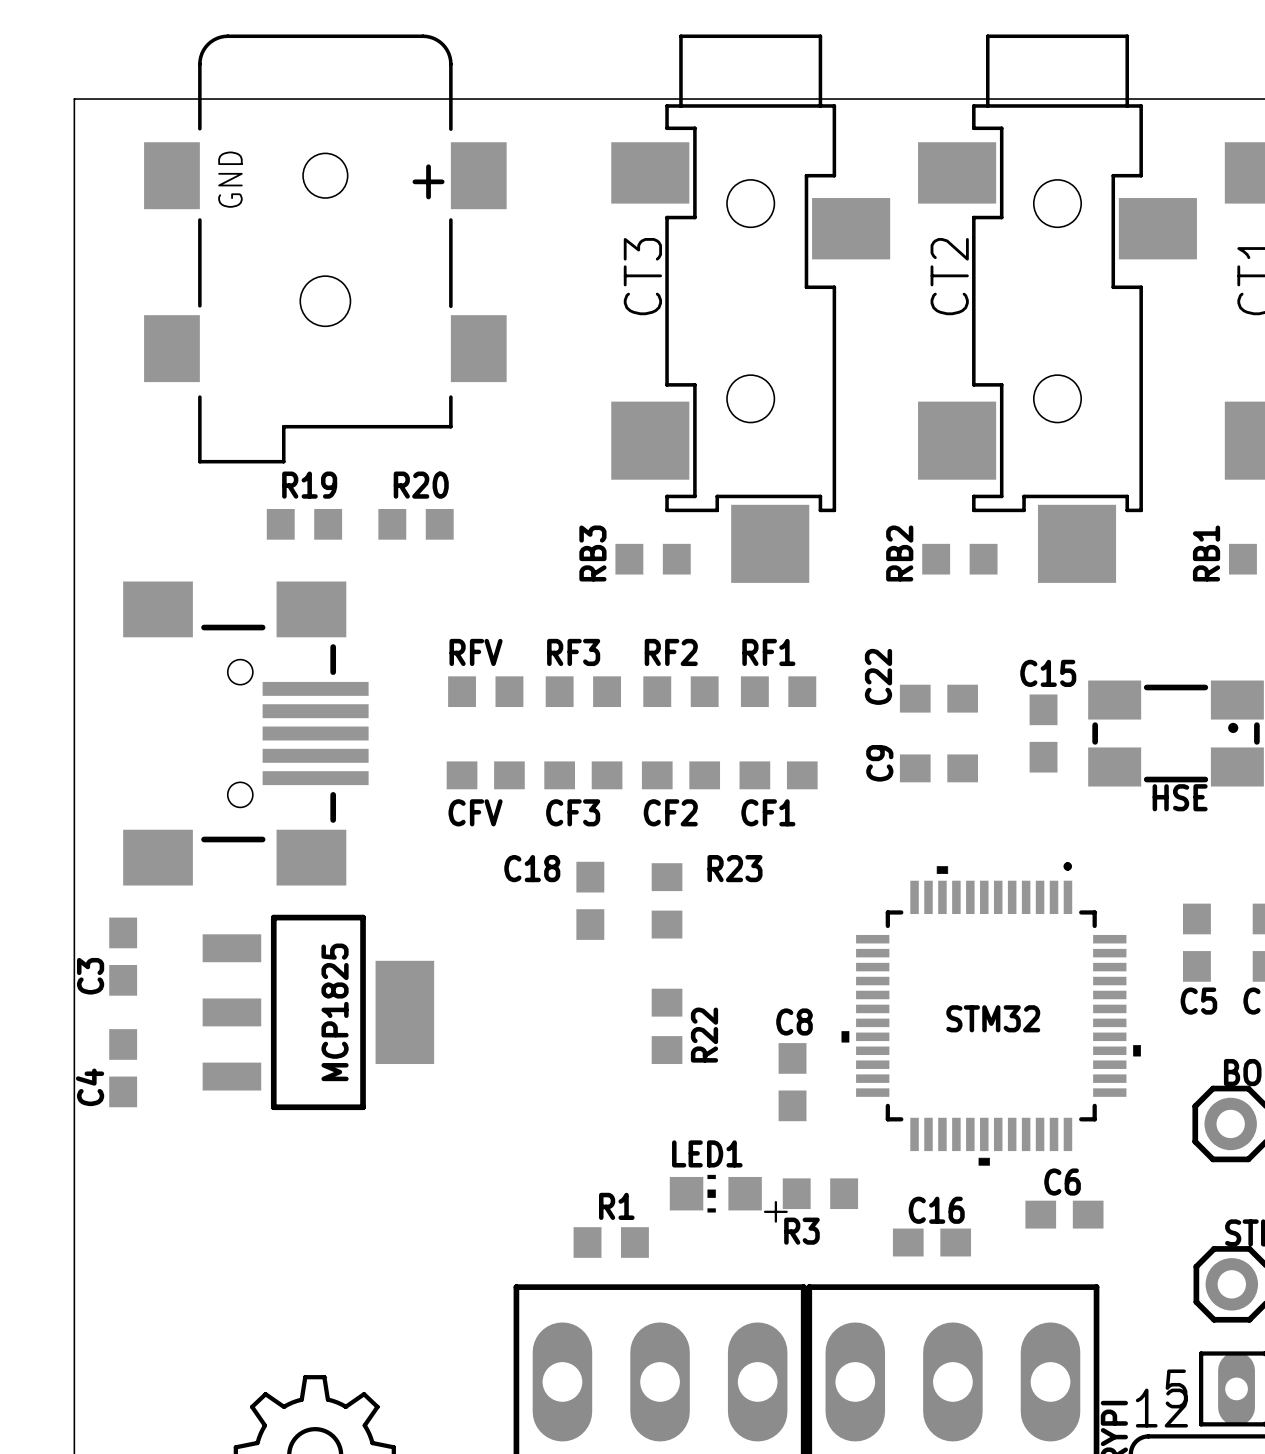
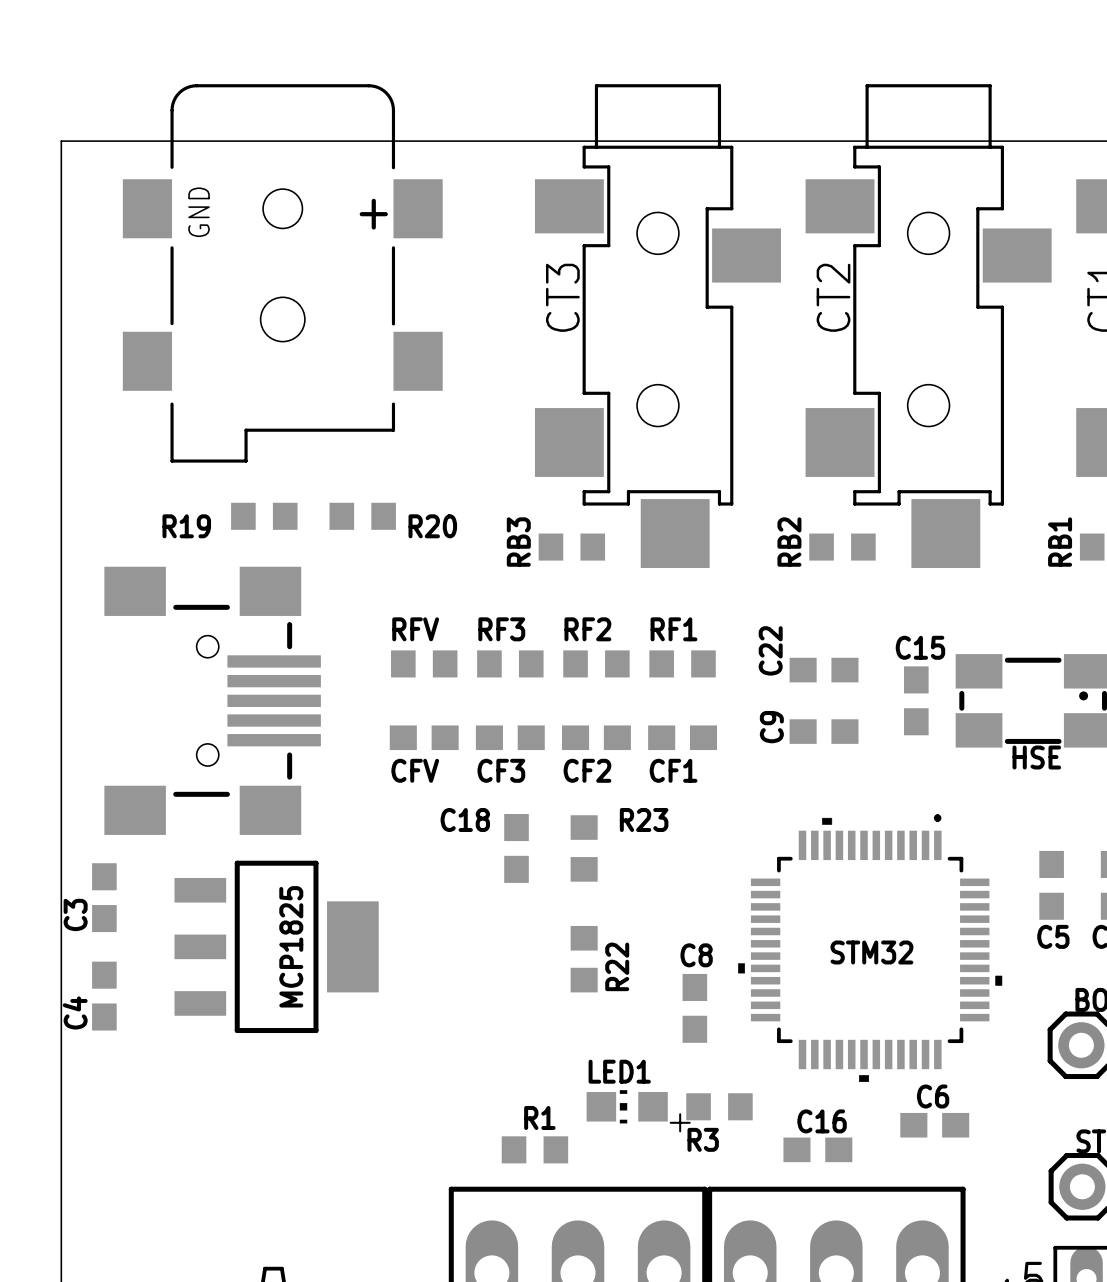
R19 name position: R19 (309, 485) -> R19 (186, 526)
R20 name position: R20 (421, 485) -> R20 (432, 526)

